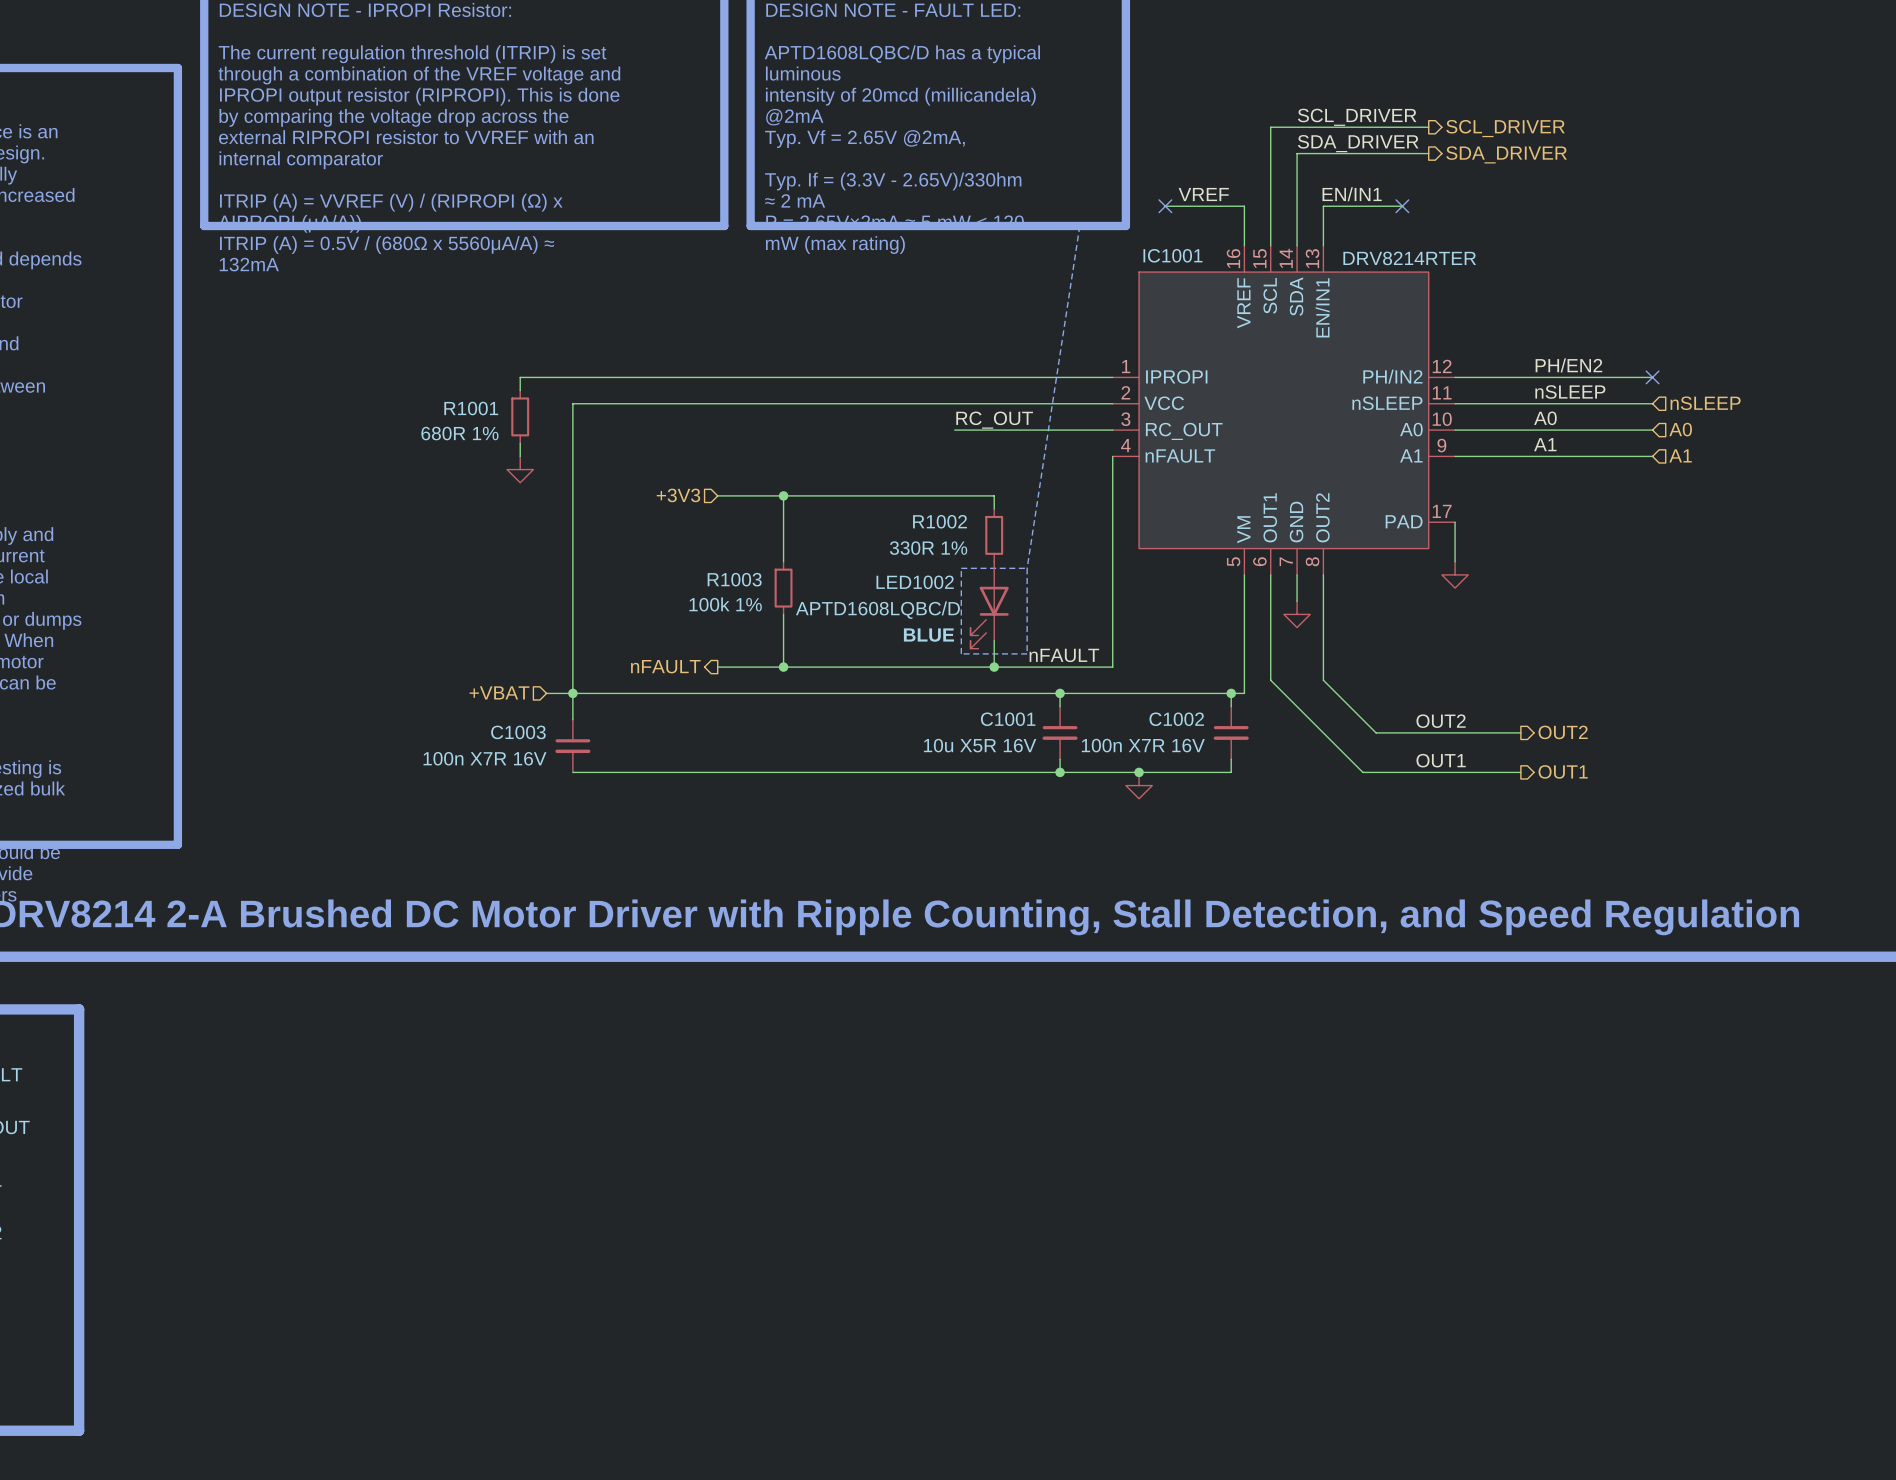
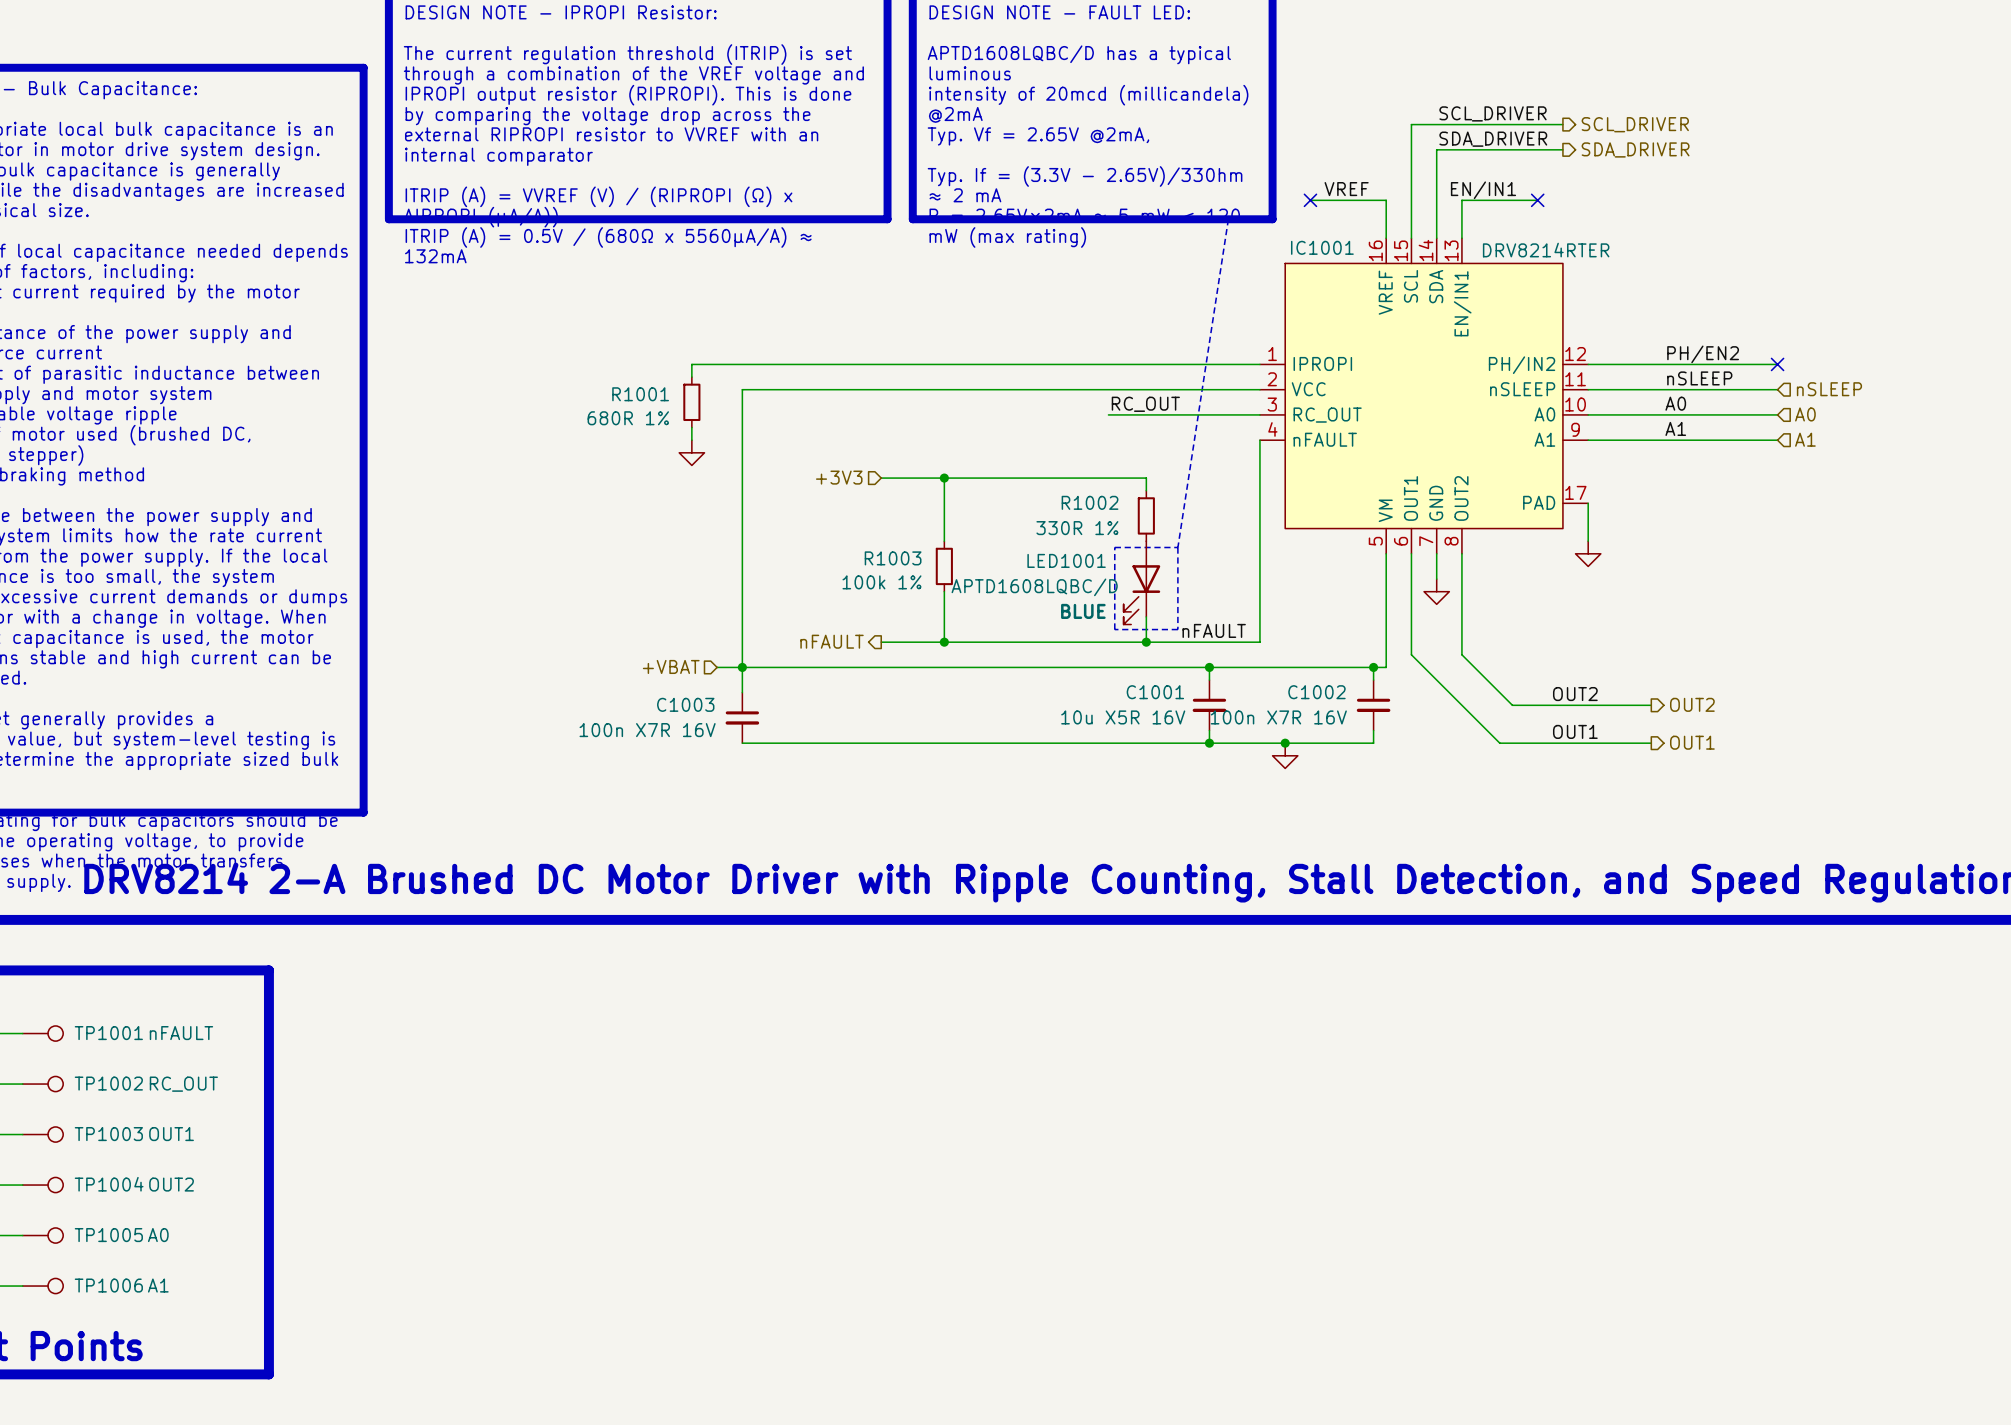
LED1002 name: LED1002 (915, 582) -> LED1001 (1066, 560)

